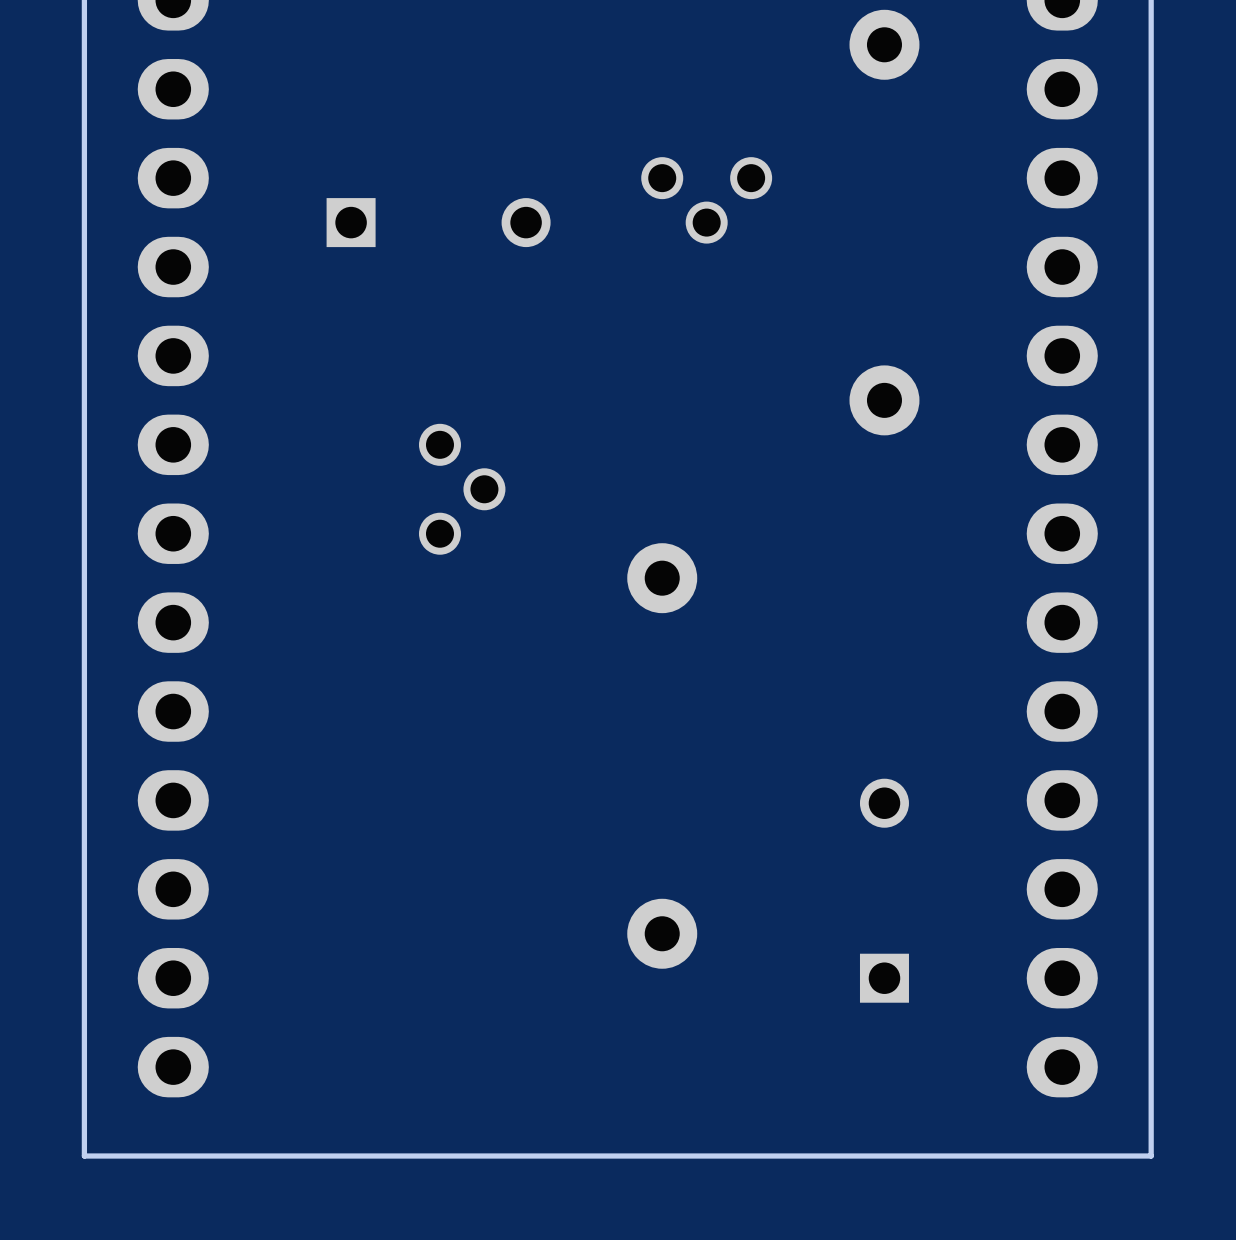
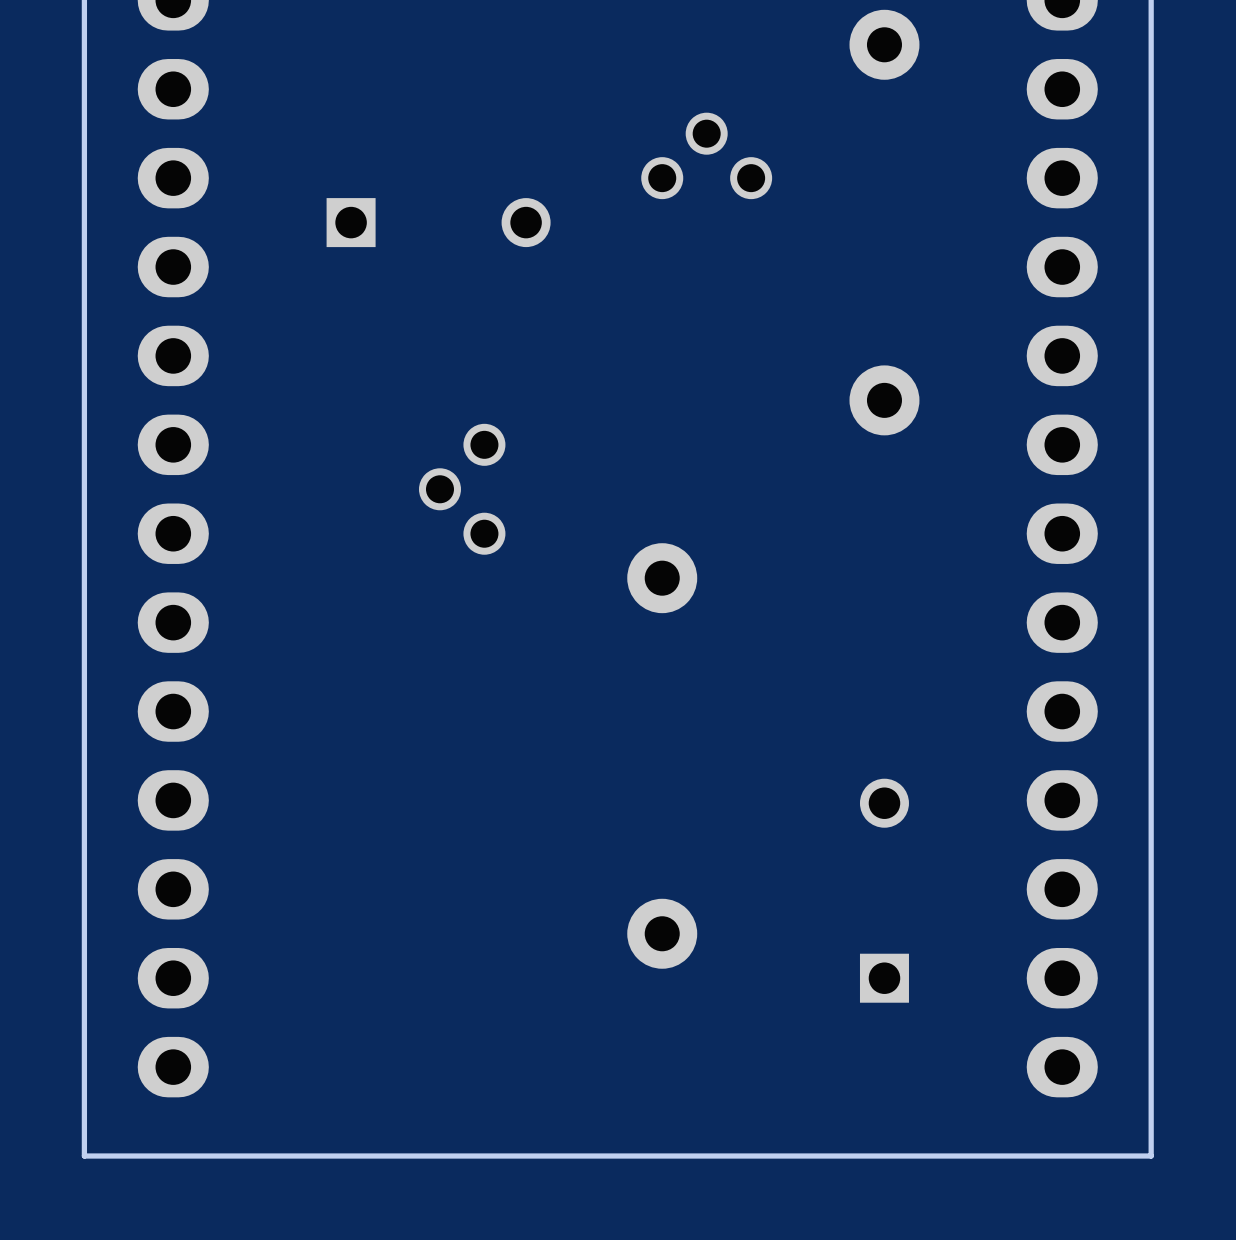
part rotation: 0° (706, 200) -> 180° (706, 155)
part rotation: 0° (462, 489) -> 180° (462, 489)

